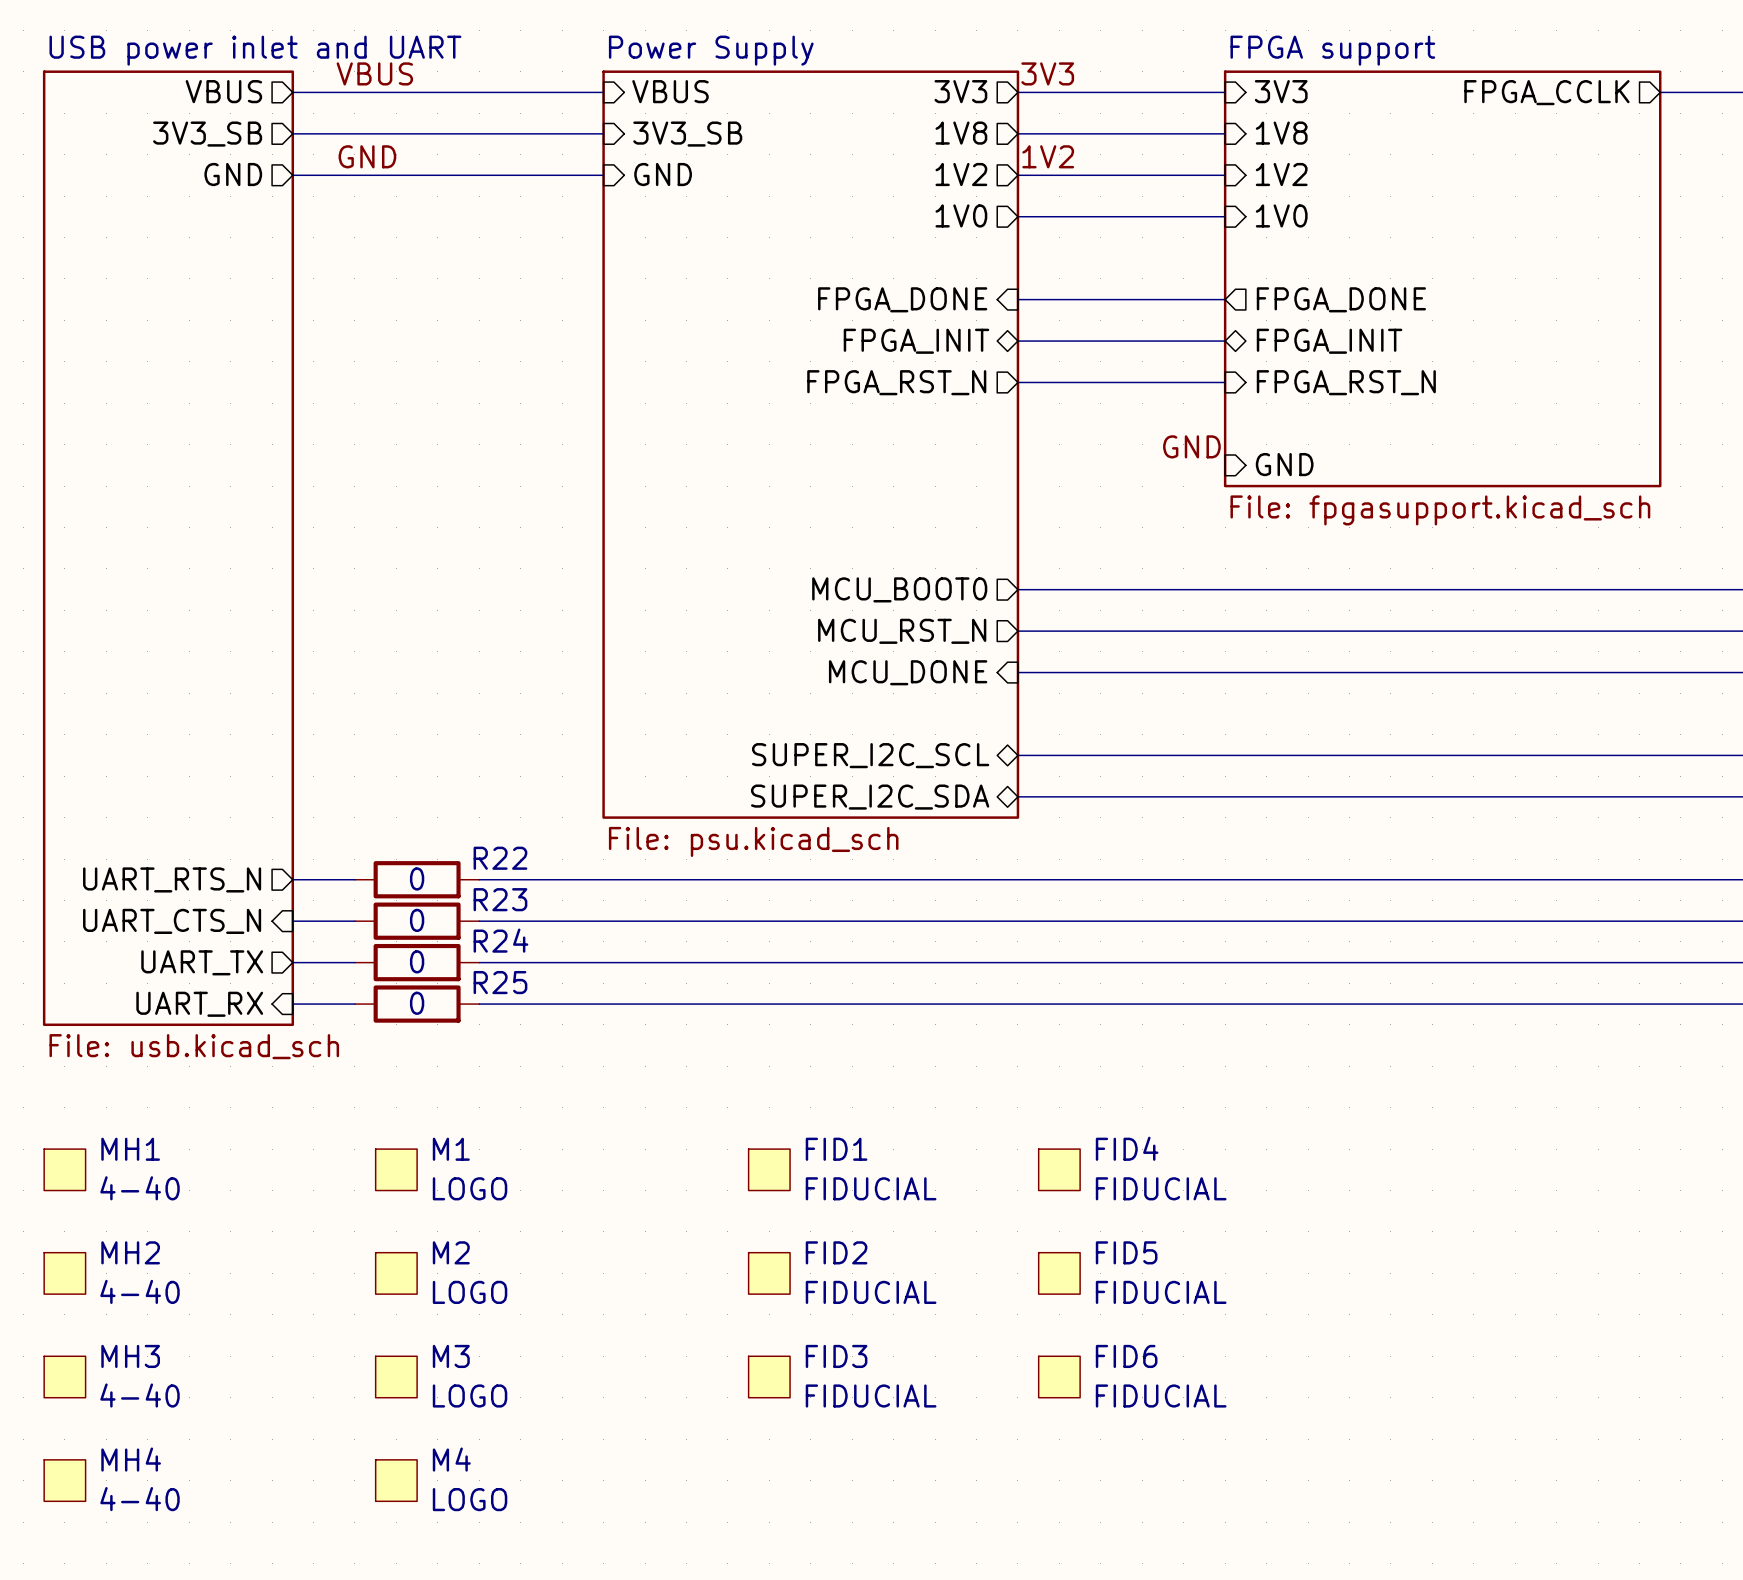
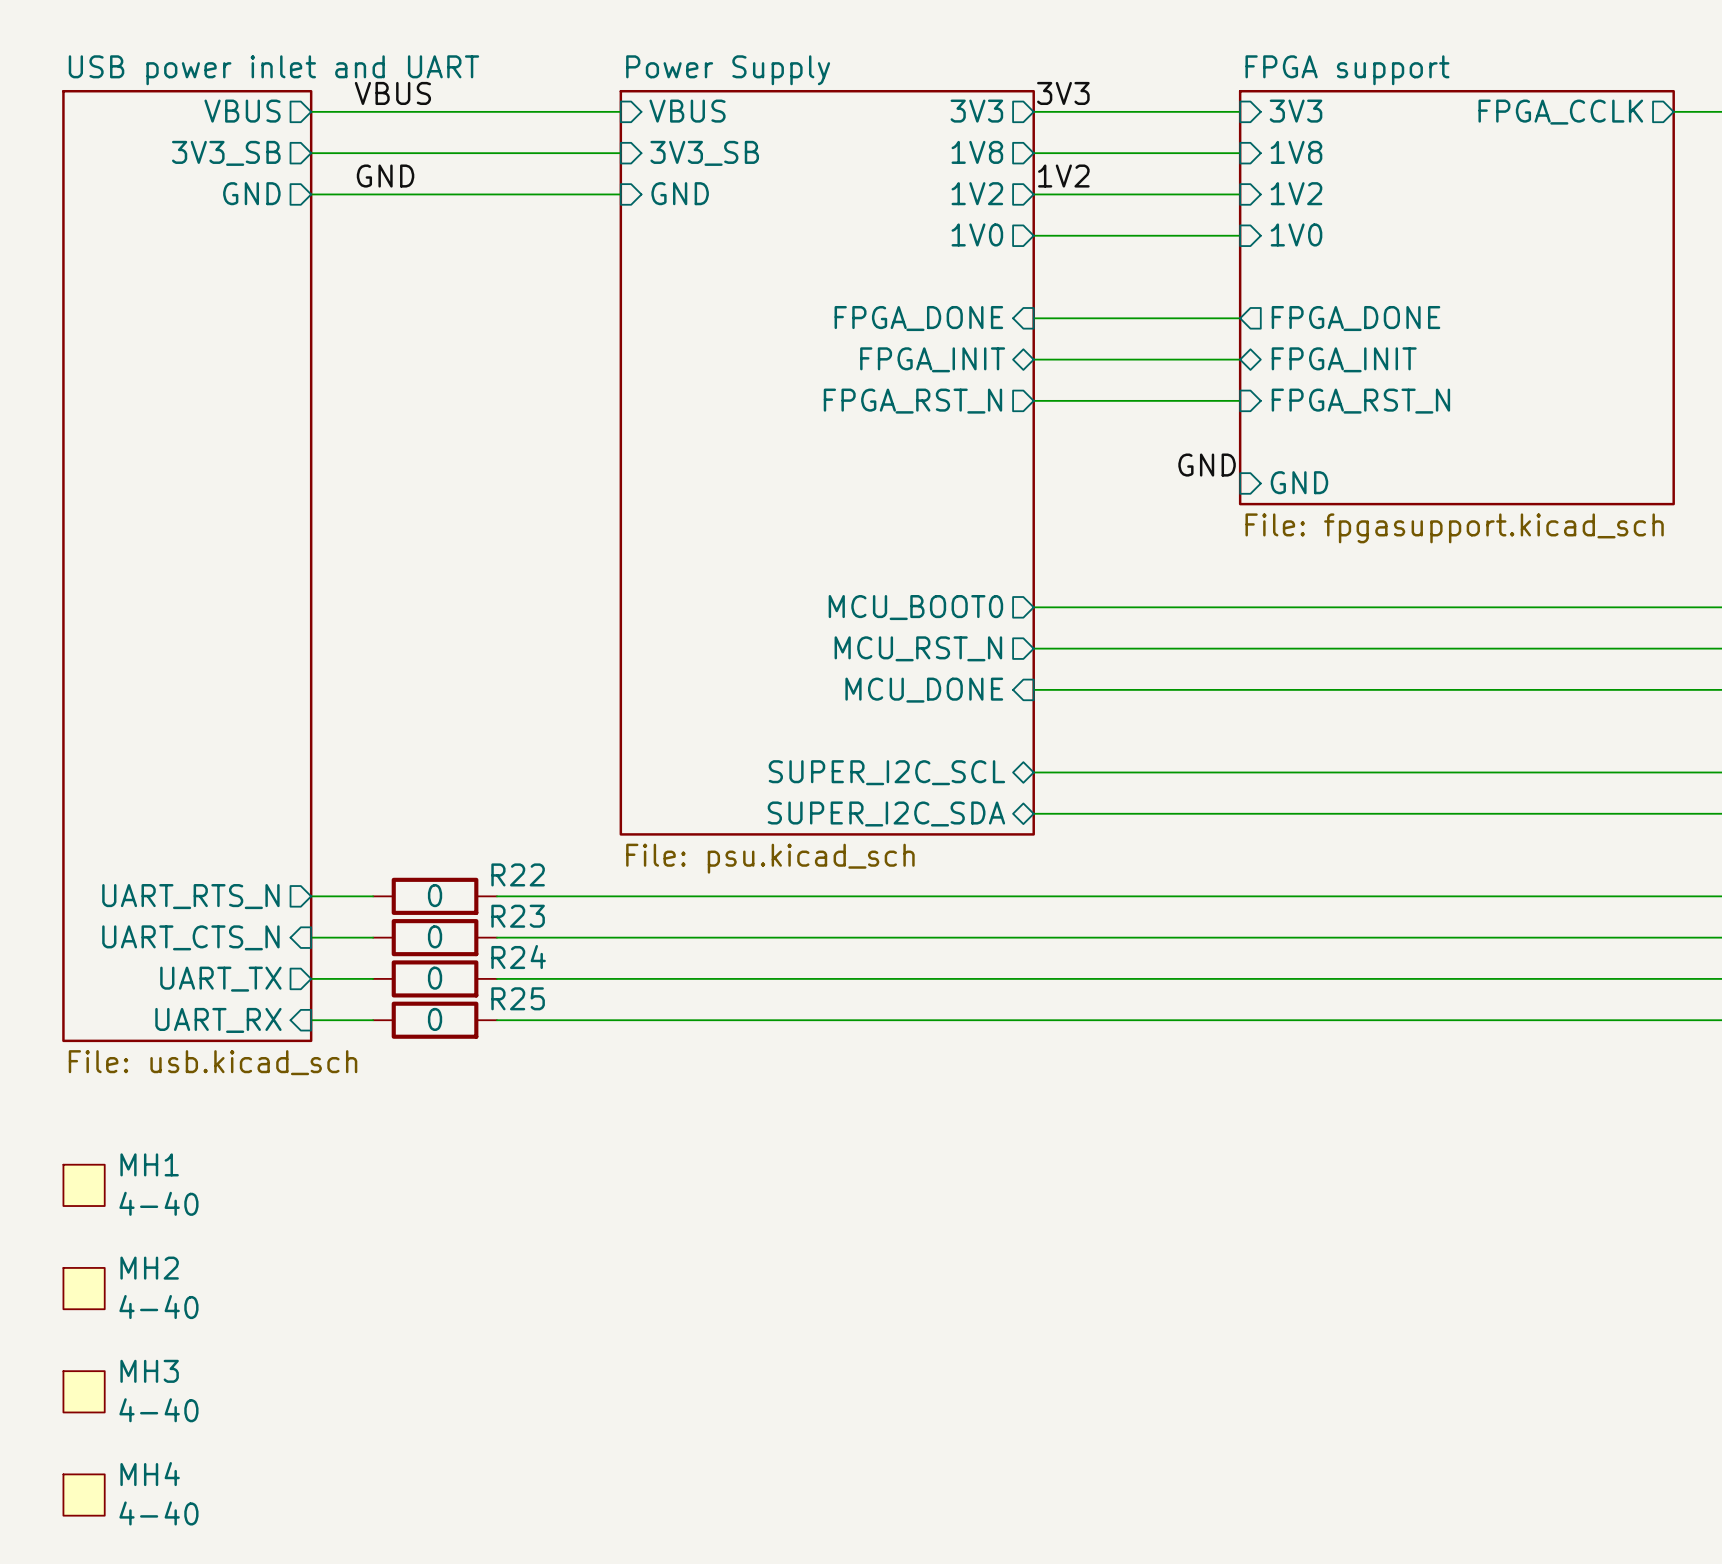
M1: LOGO (396, 1169) -> none
FID1: FIDUCIAL (769, 1169) -> none
FID4: FIDUCIAL (1059, 1169) -> none
M2: LOGO (396, 1273) -> none
FID2: FIDUCIAL (769, 1273) -> none
FID5: FIDUCIAL (1059, 1273) -> none
M3: LOGO (396, 1376) -> none
FID3: FIDUCIAL (769, 1376) -> none
FID6: FIDUCIAL (1059, 1376) -> none
M4: LOGO (396, 1480) -> none

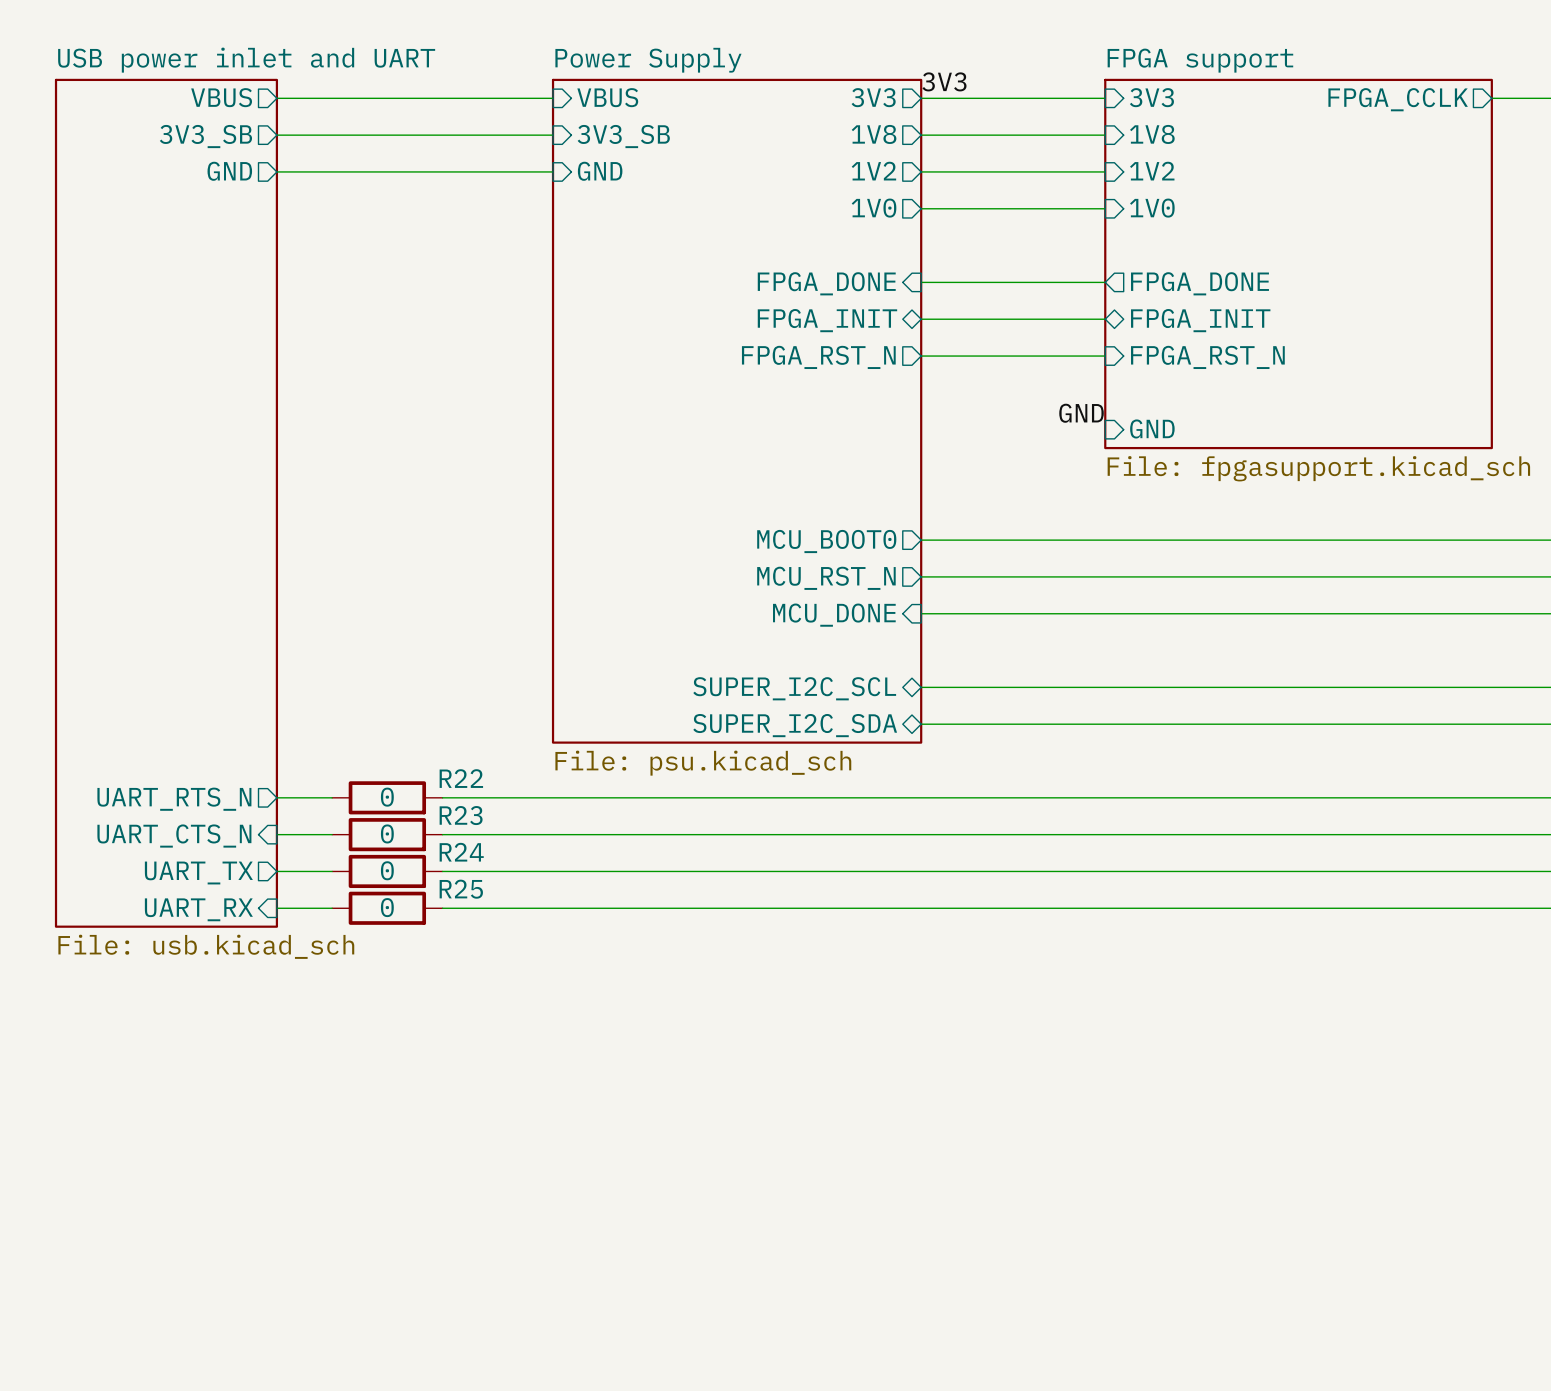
label: VBUS (392, 93) -> none
label: GND (385, 176) -> none
label: 1V2 (1063, 176) -> none
MH1: 4-40 (84, 1185) -> none
MH2: 4-40 (84, 1288) -> none
MH3: 4-40 (84, 1391) -> none
MH4: 4-40 (84, 1495) -> none

